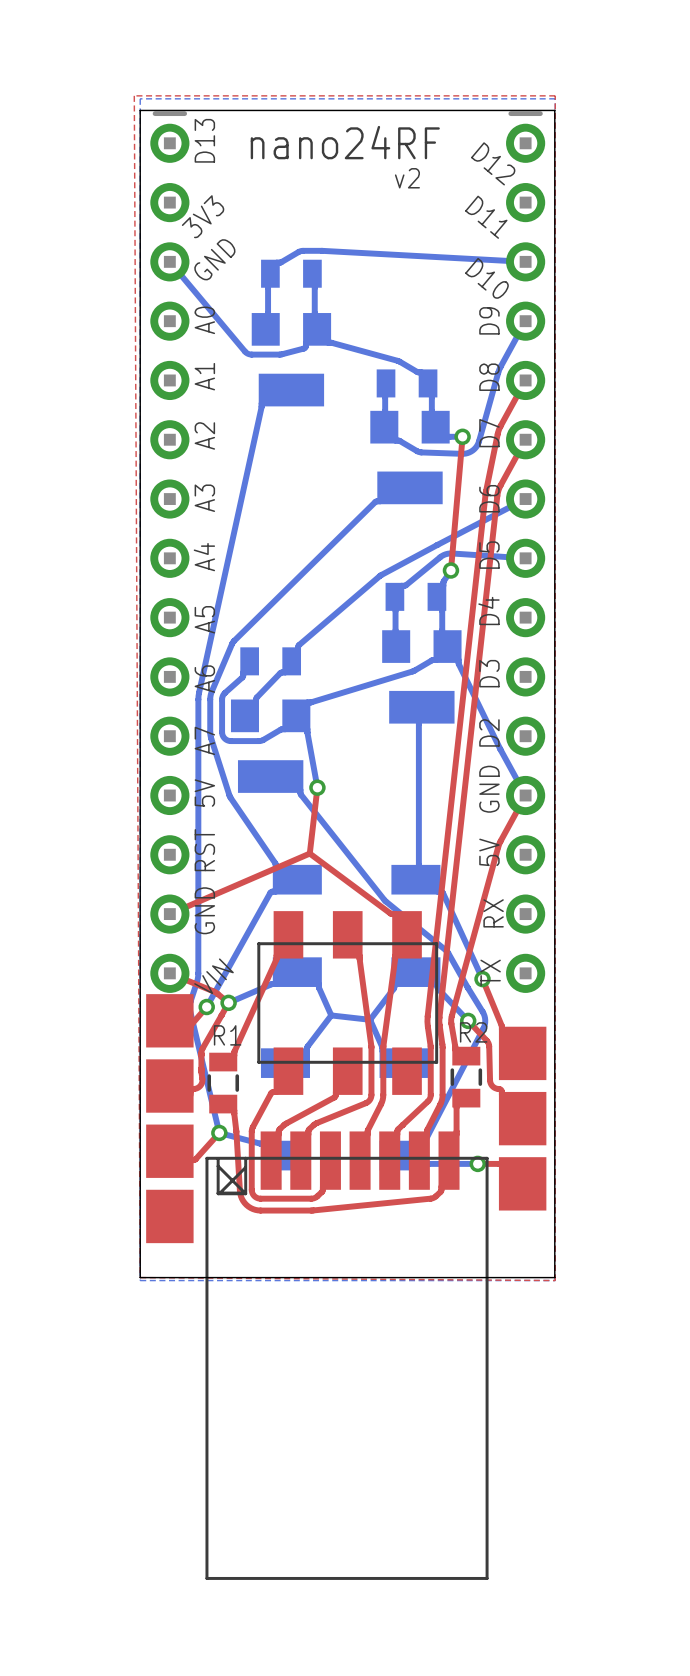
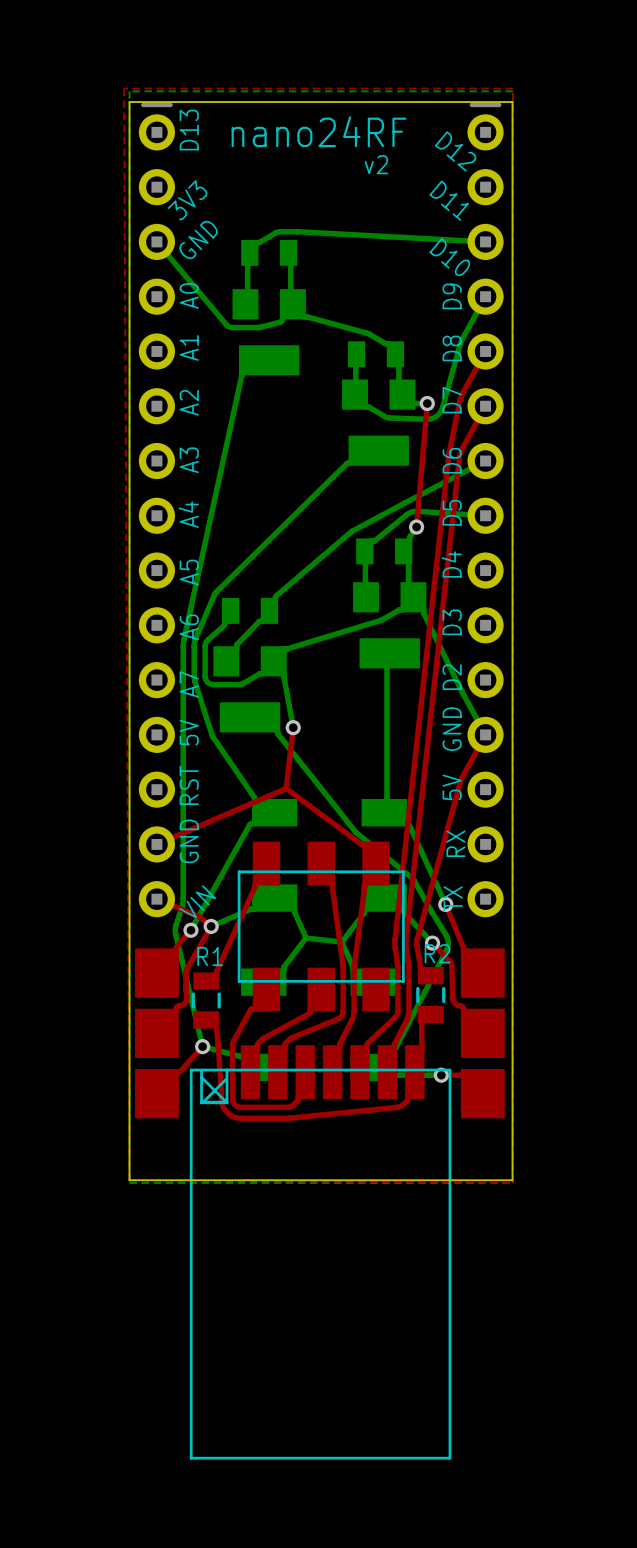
part footprint: [146, 994, 194, 1244] -> [135, 948, 179, 1119]

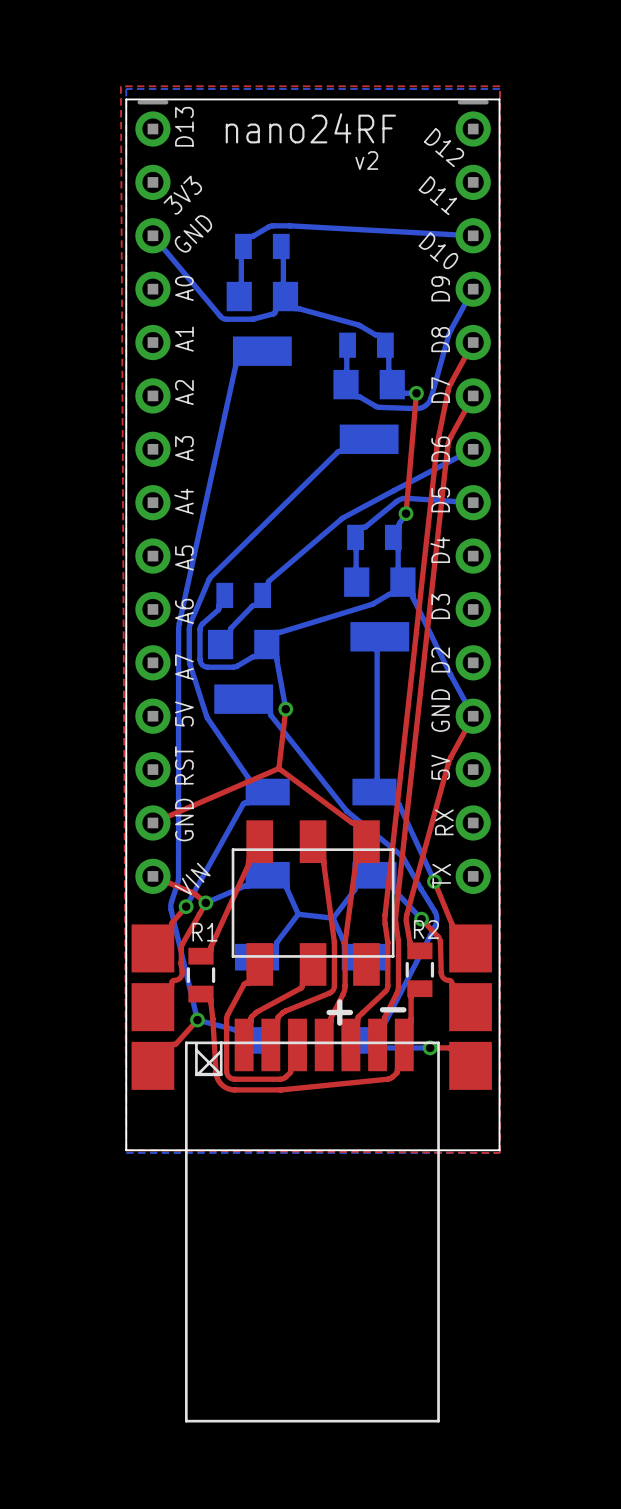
line: none -> (339, 1001) (339, 1023)
line: none -> (382, 1009) (403, 1009)
line: none -> (329, 1012) (350, 1012)

